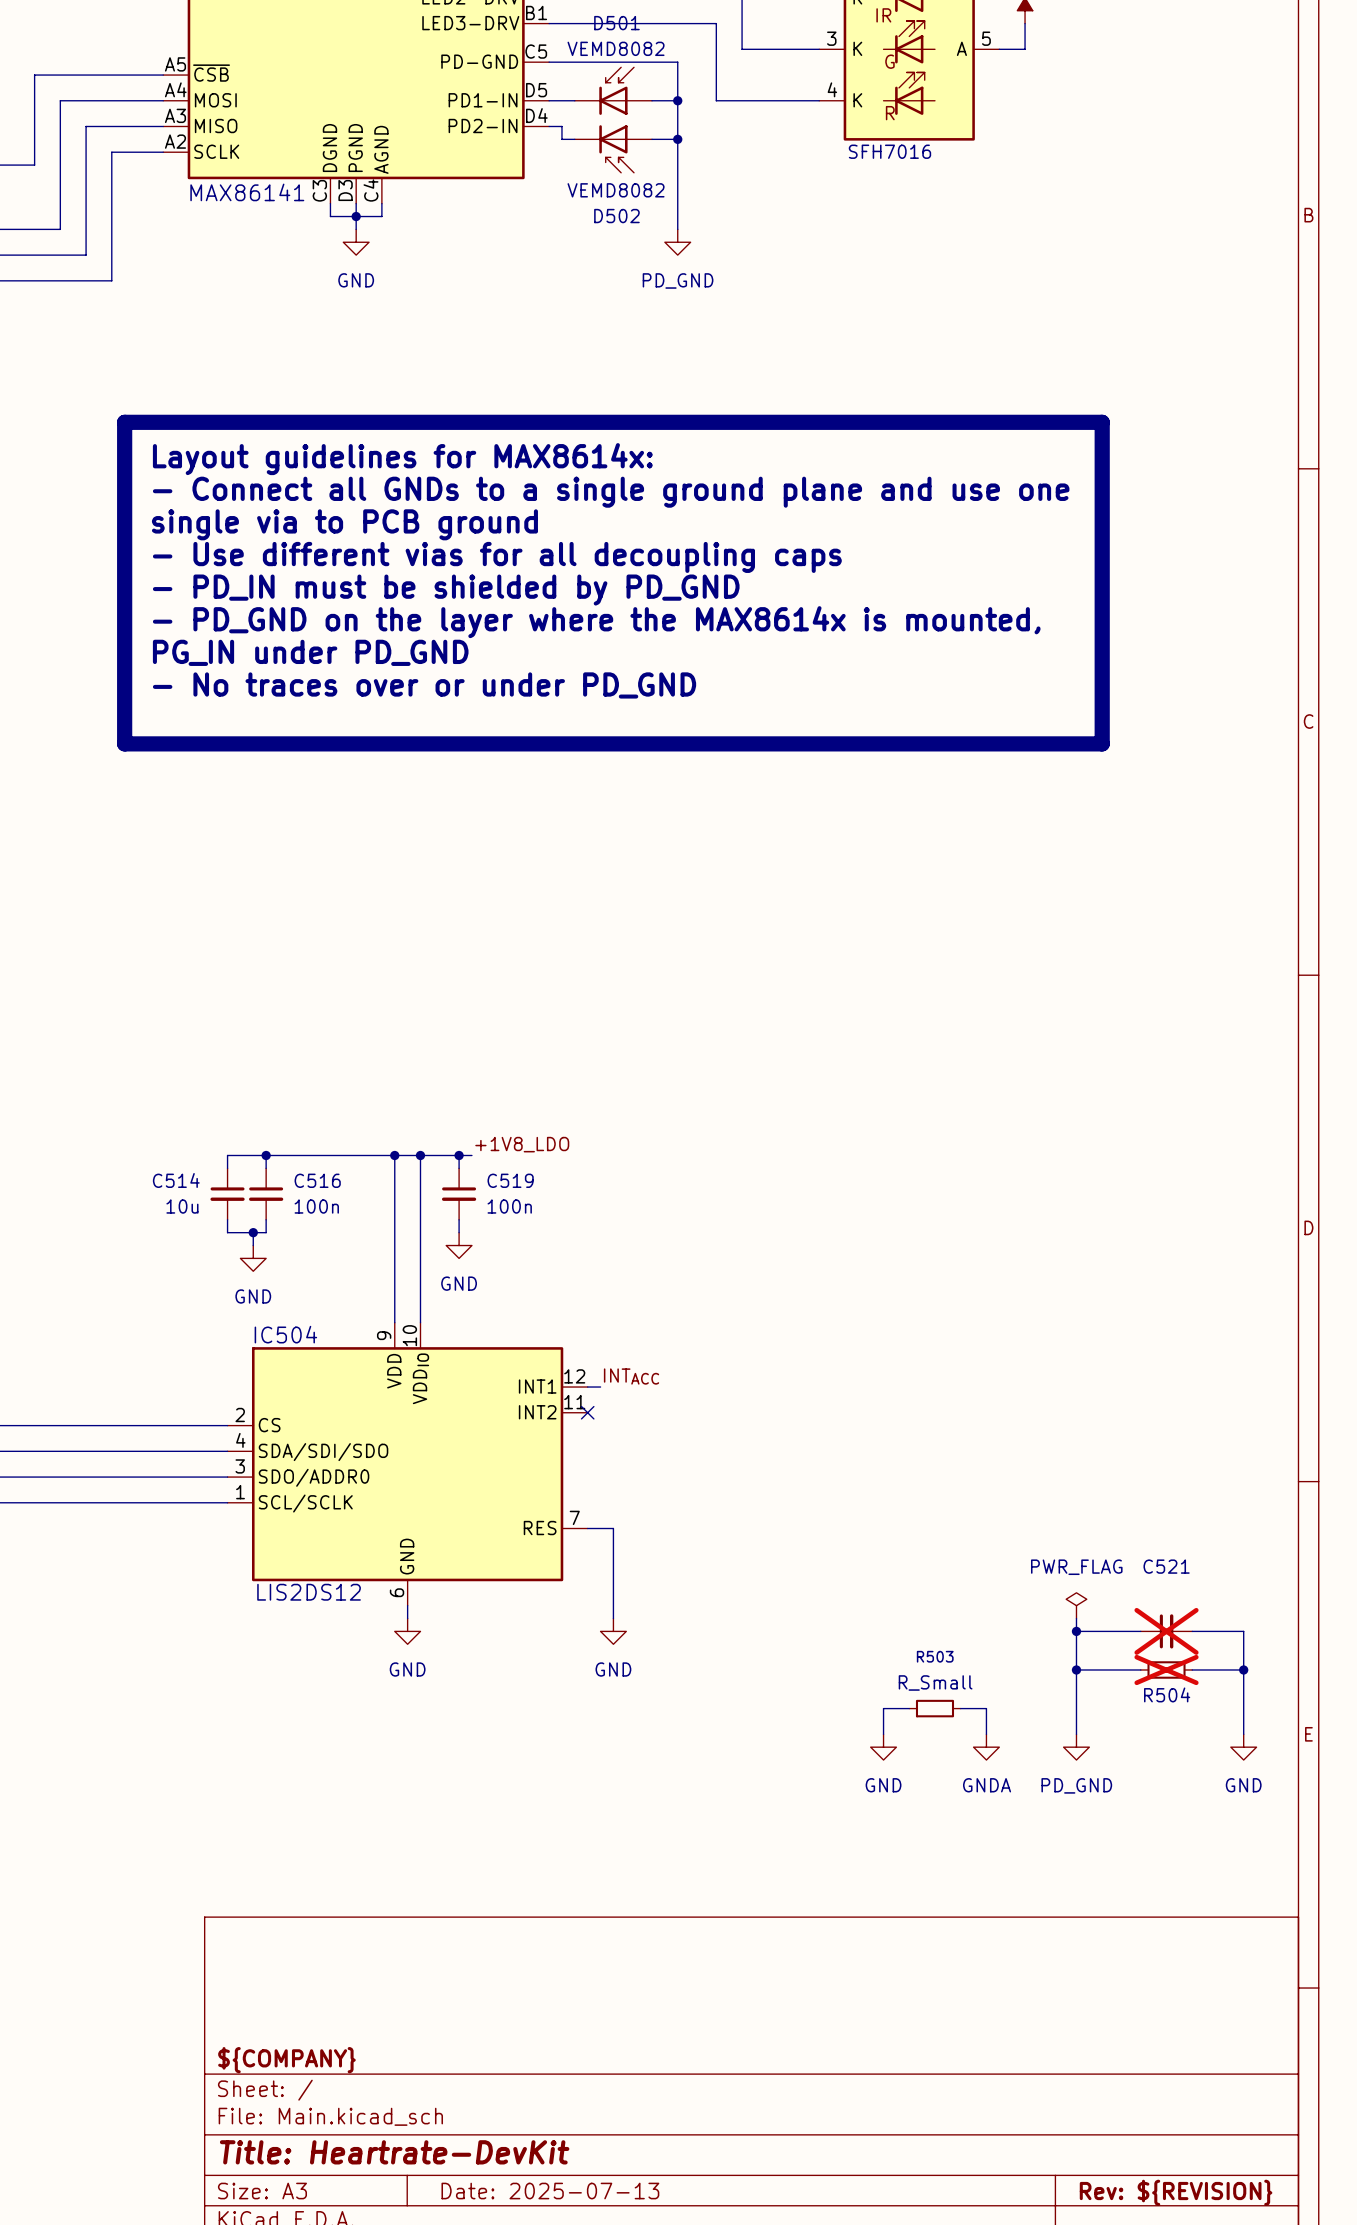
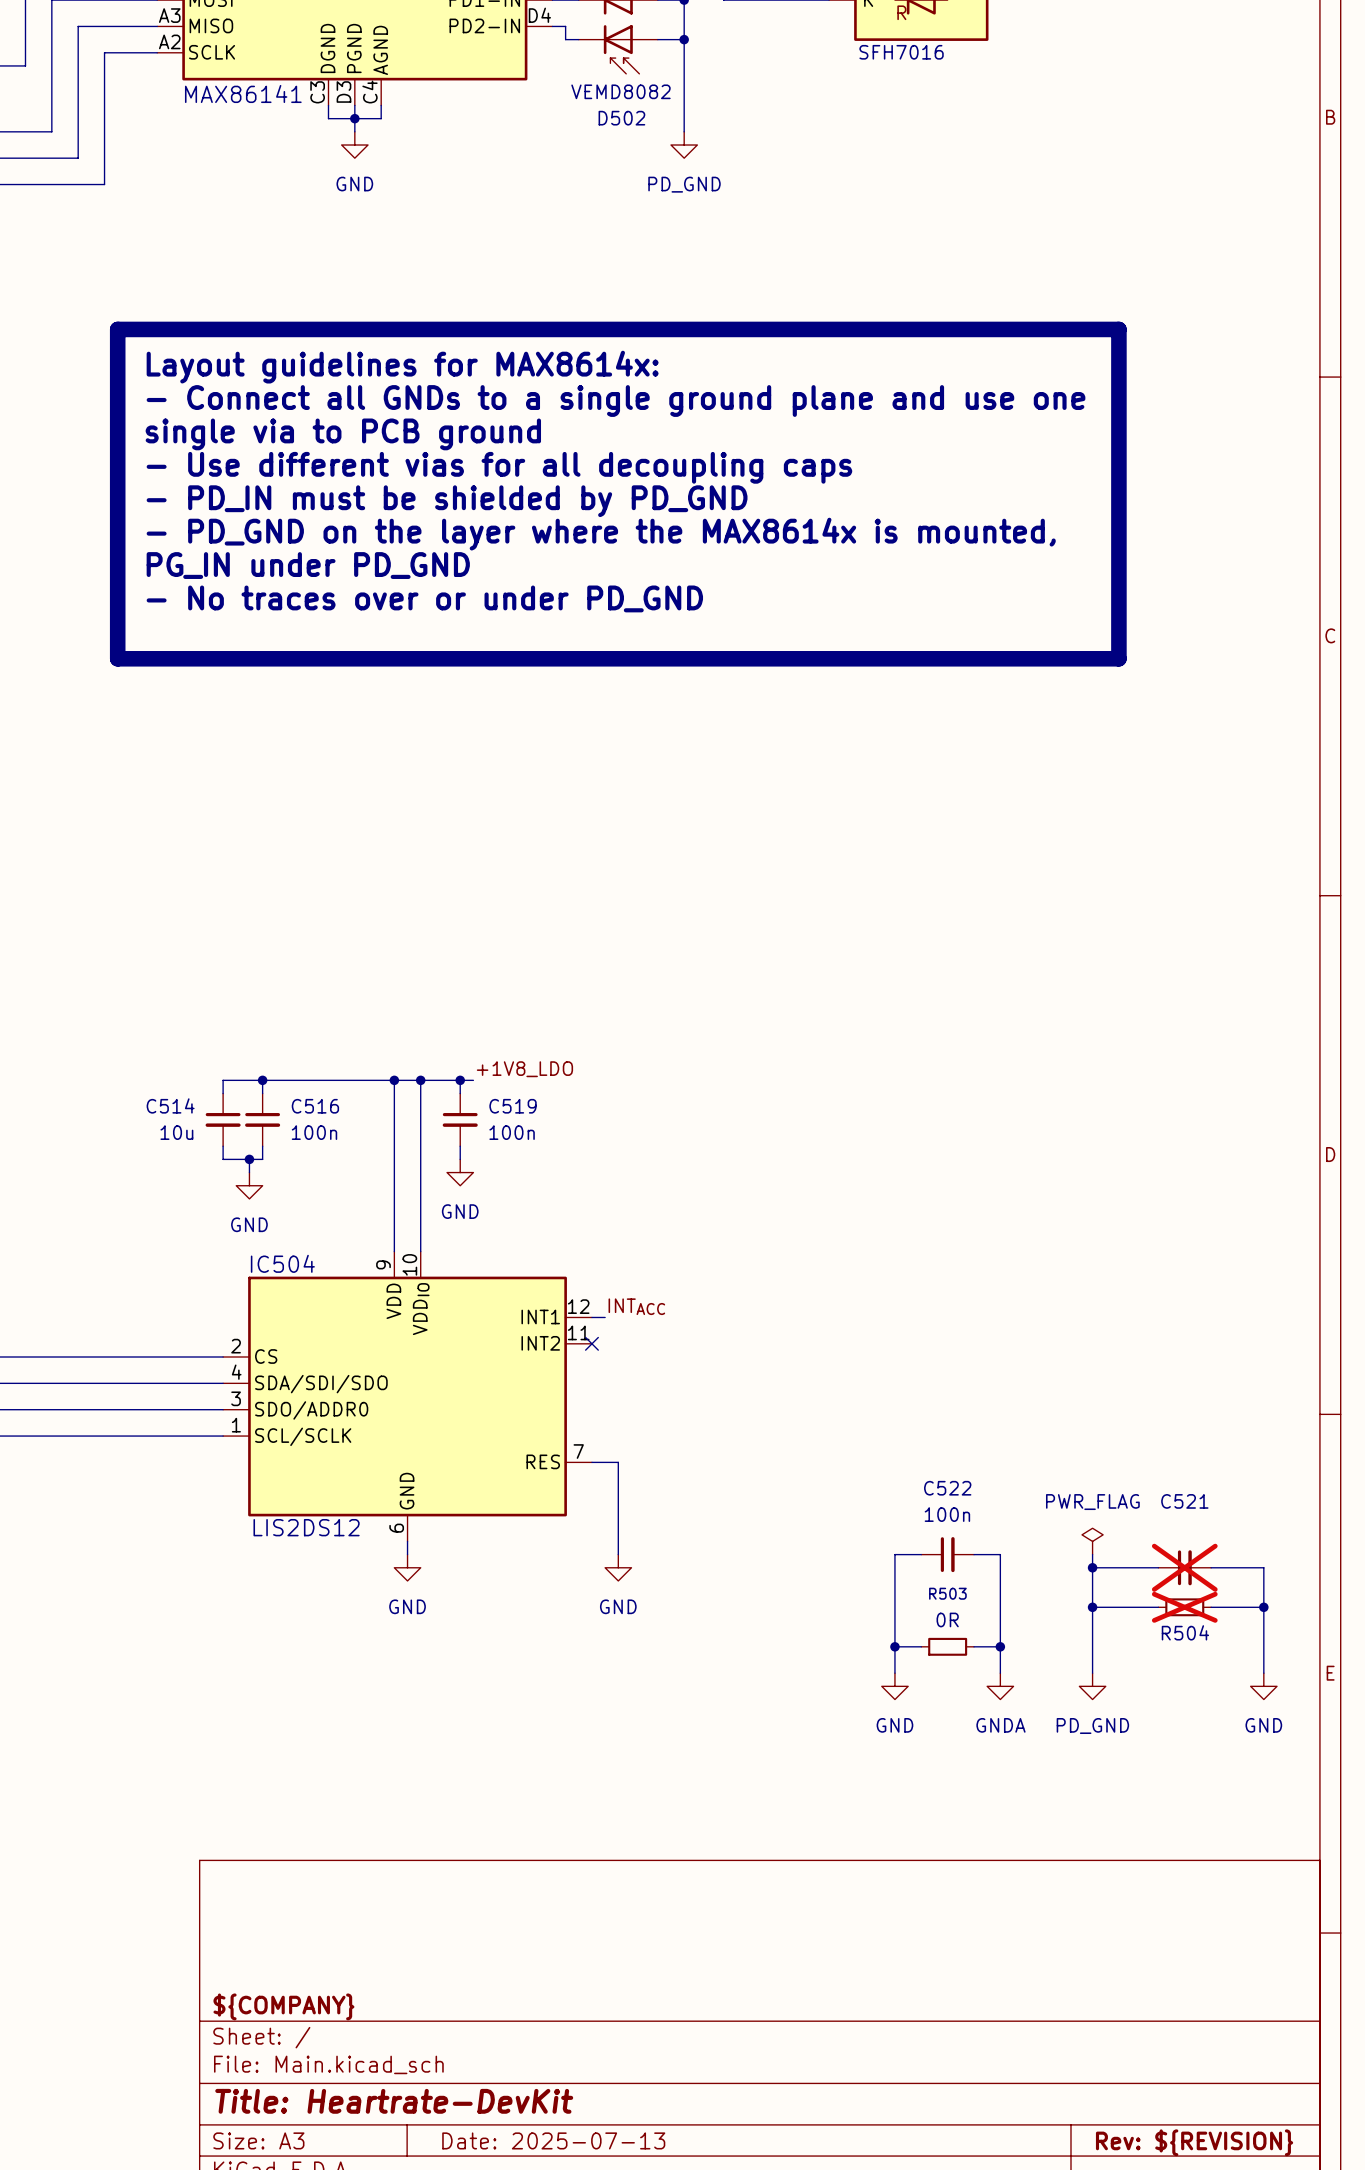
wire: none -> (921, 1554) (894, 1554) (894, 1646)
C522: none -> 100n (947, 1554)
wire: none -> (974, 1554) (1000, 1554) (1000, 1646)
R503 value: R_Small (935, 1682) -> 0R (947, 1619)
junction: none -> (894, 1646)
junction: none -> (1000, 1646)

